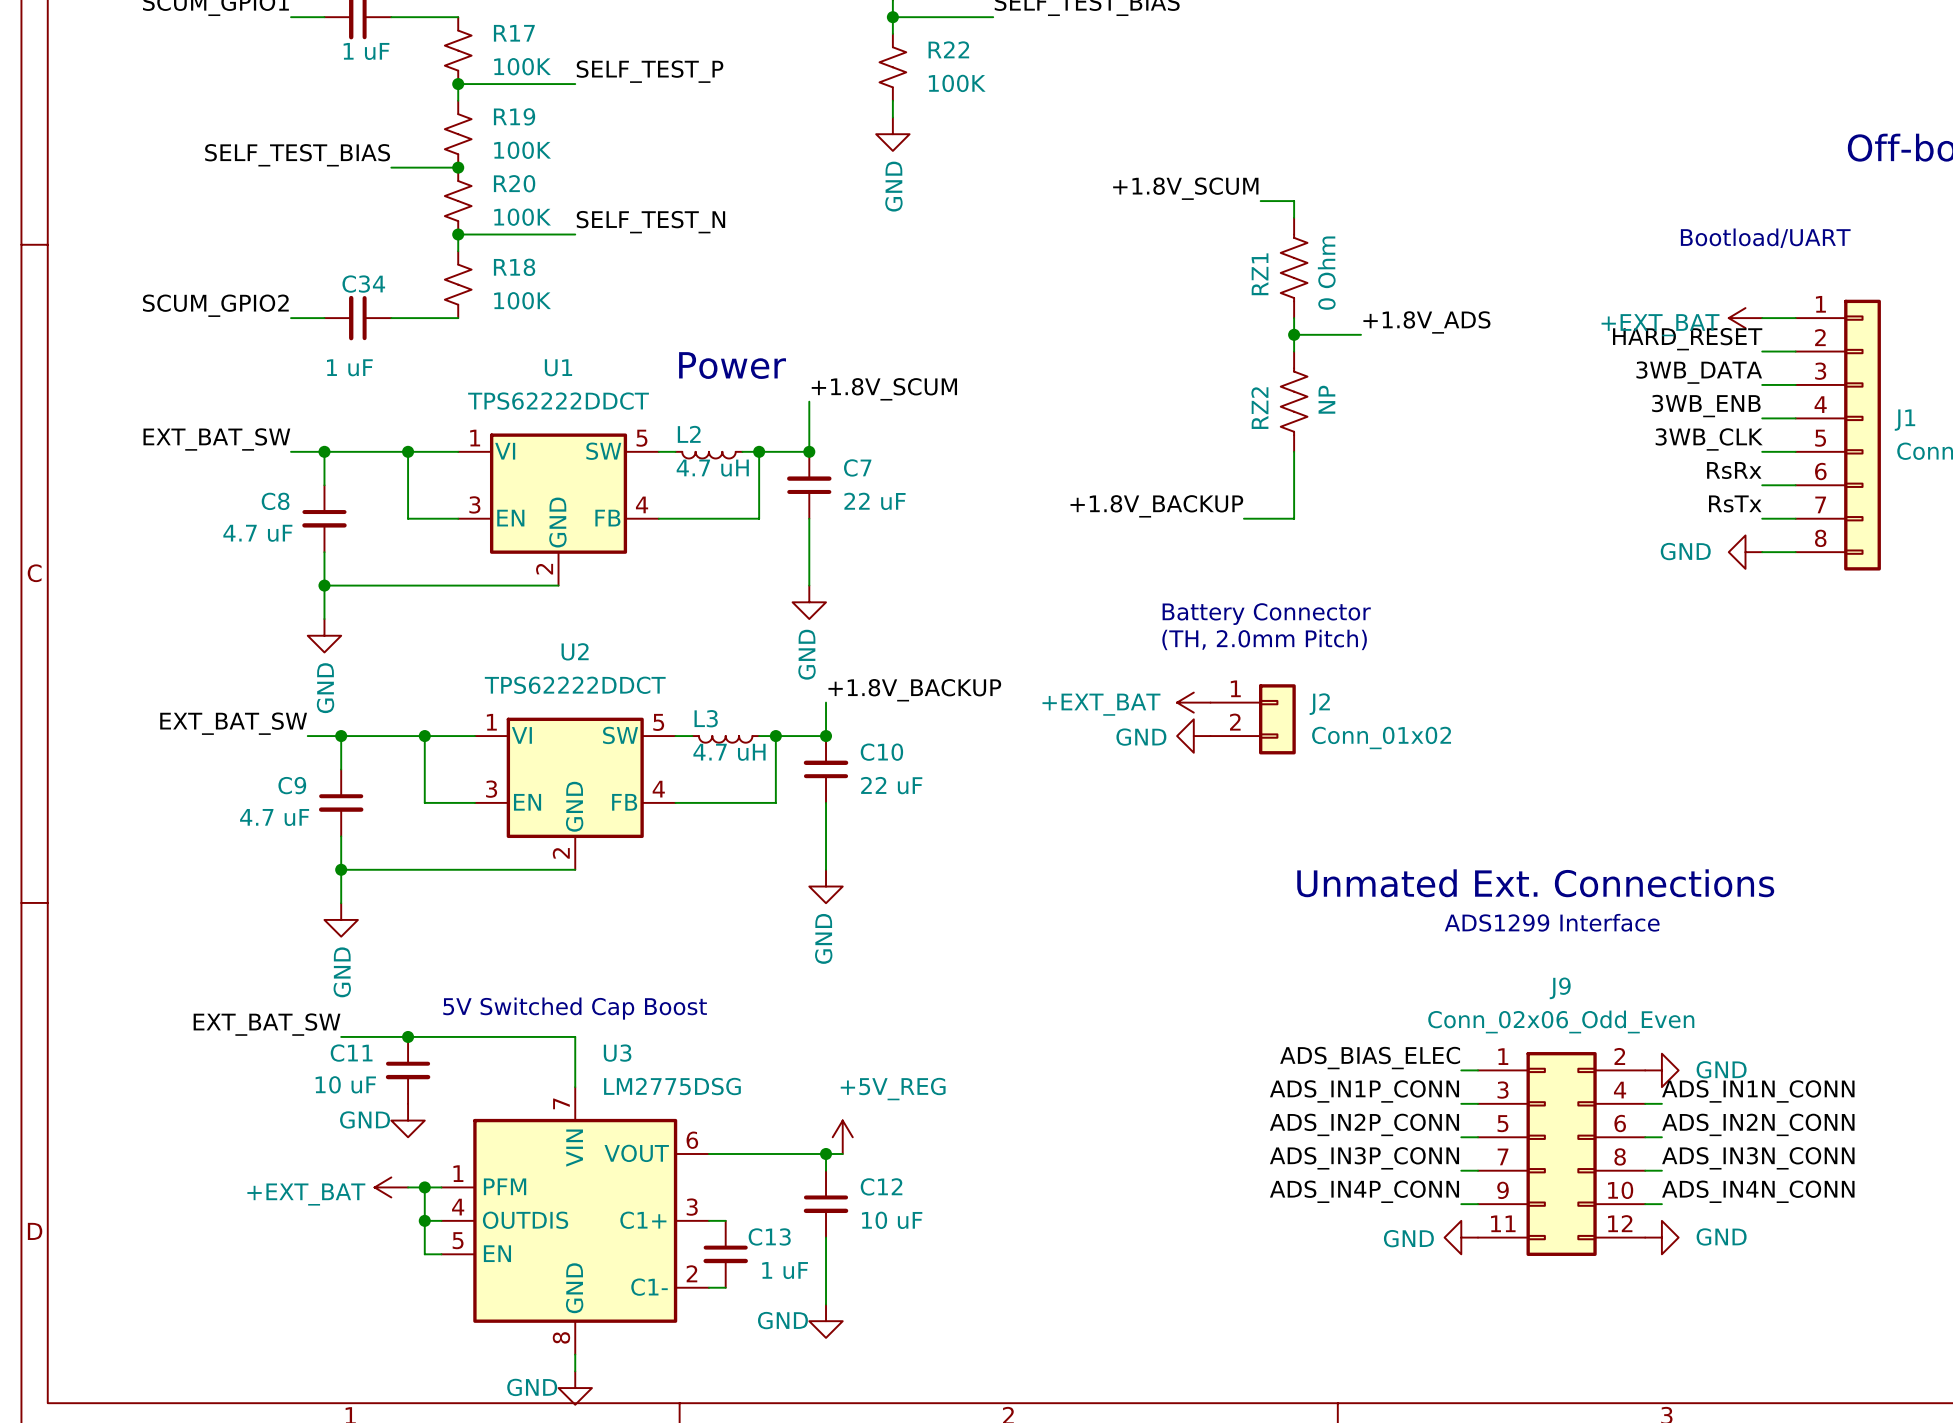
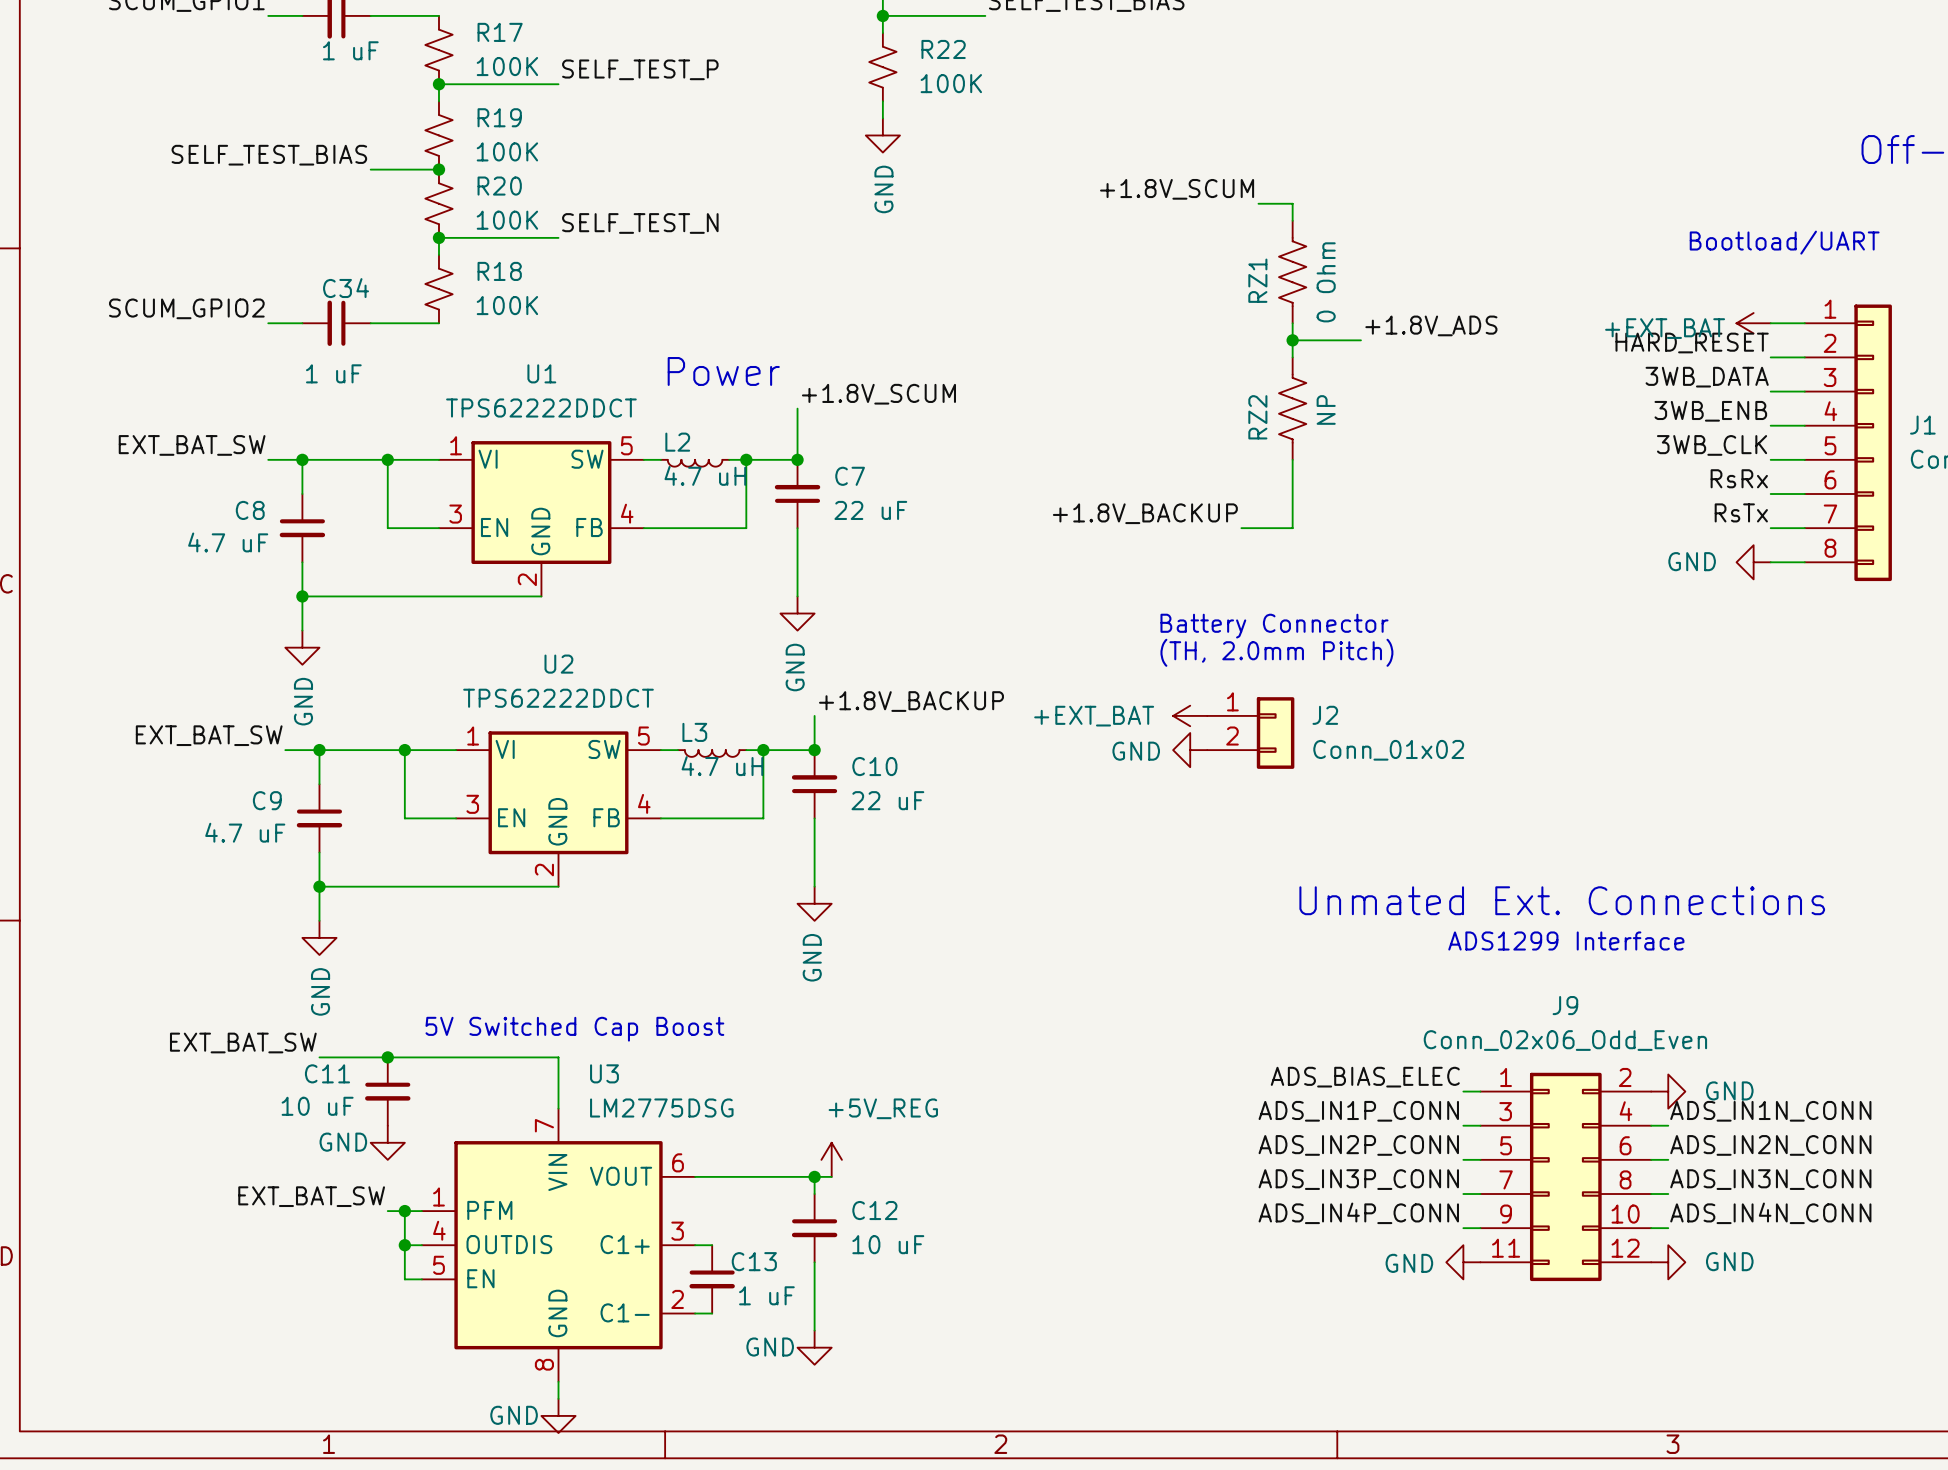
label: none -> EXT_BAT_SW (311, 1196)
power symbol: +EXT_BAT (391, 1187) -> none

